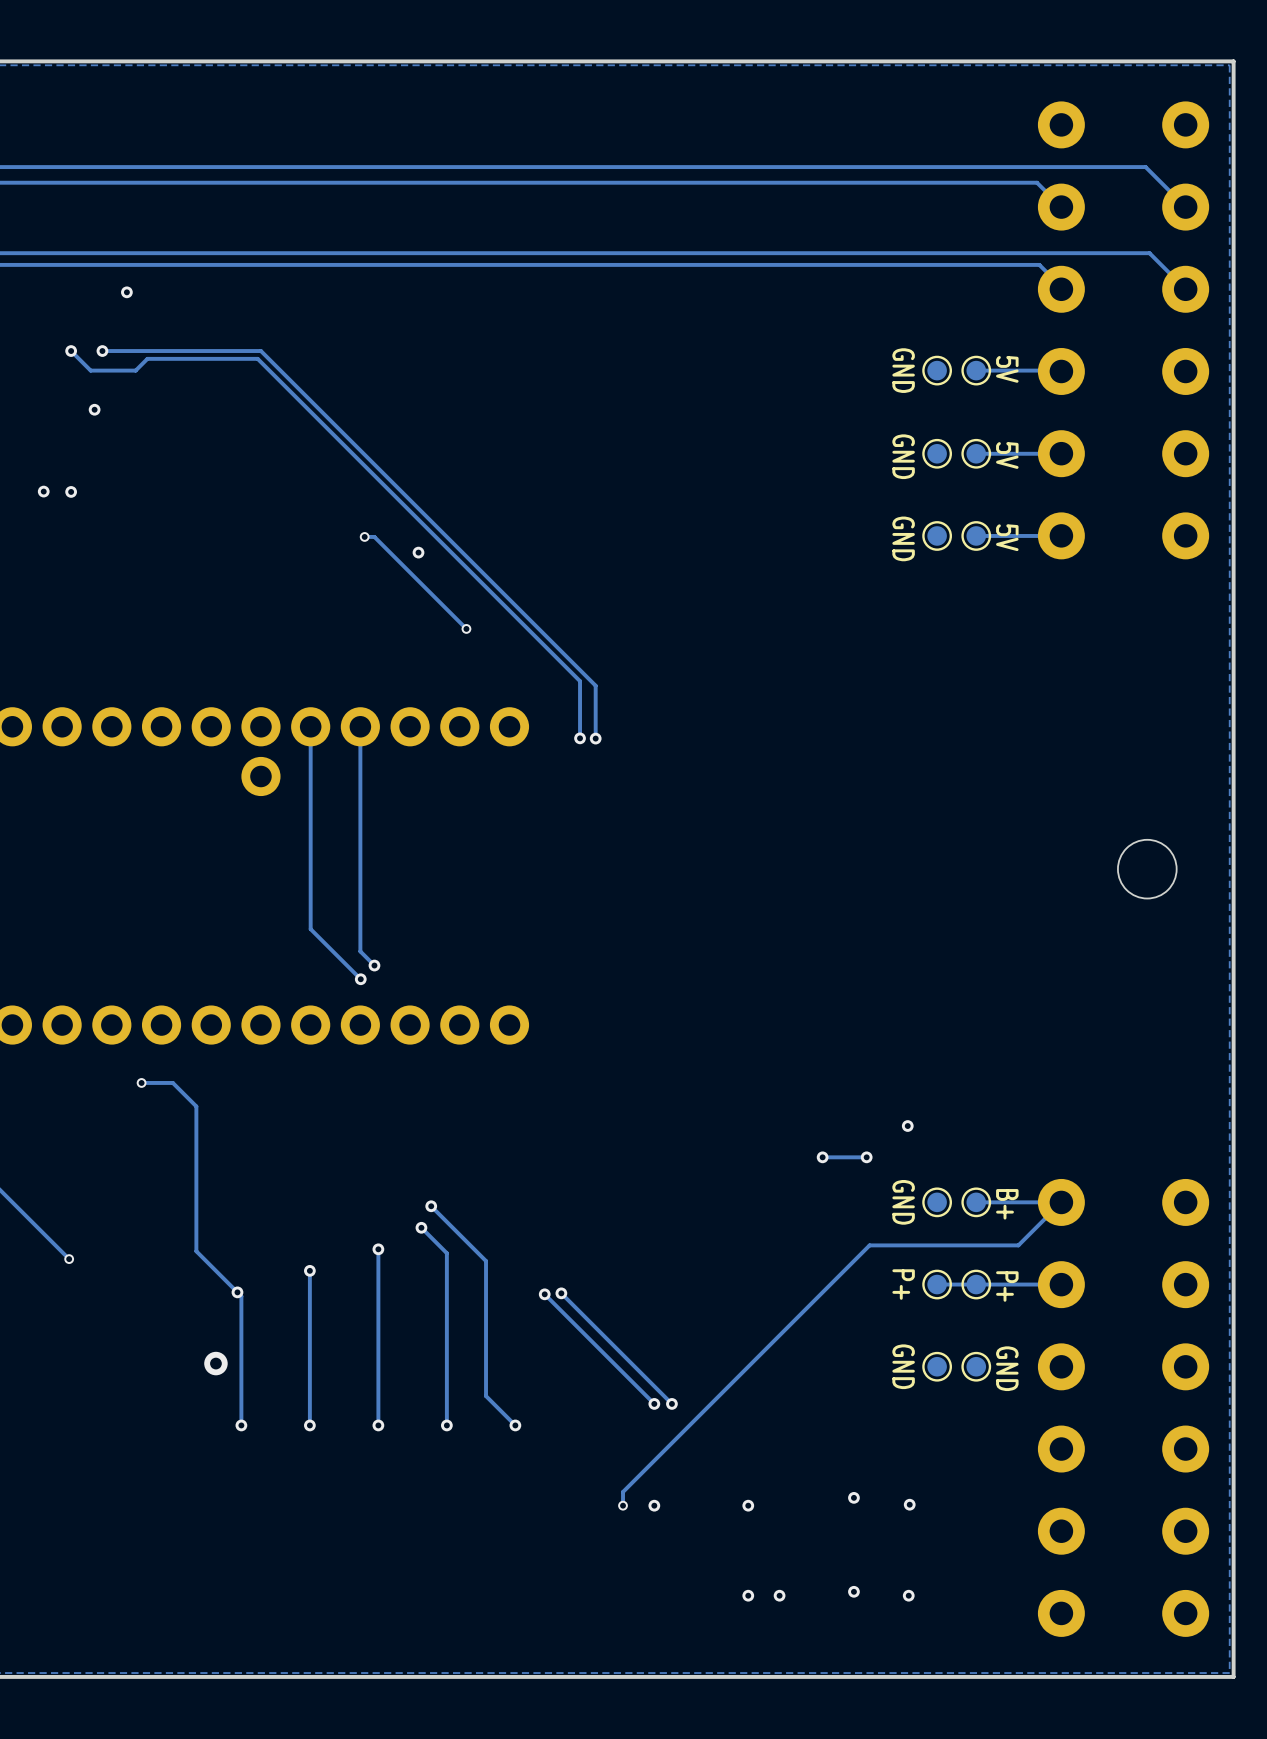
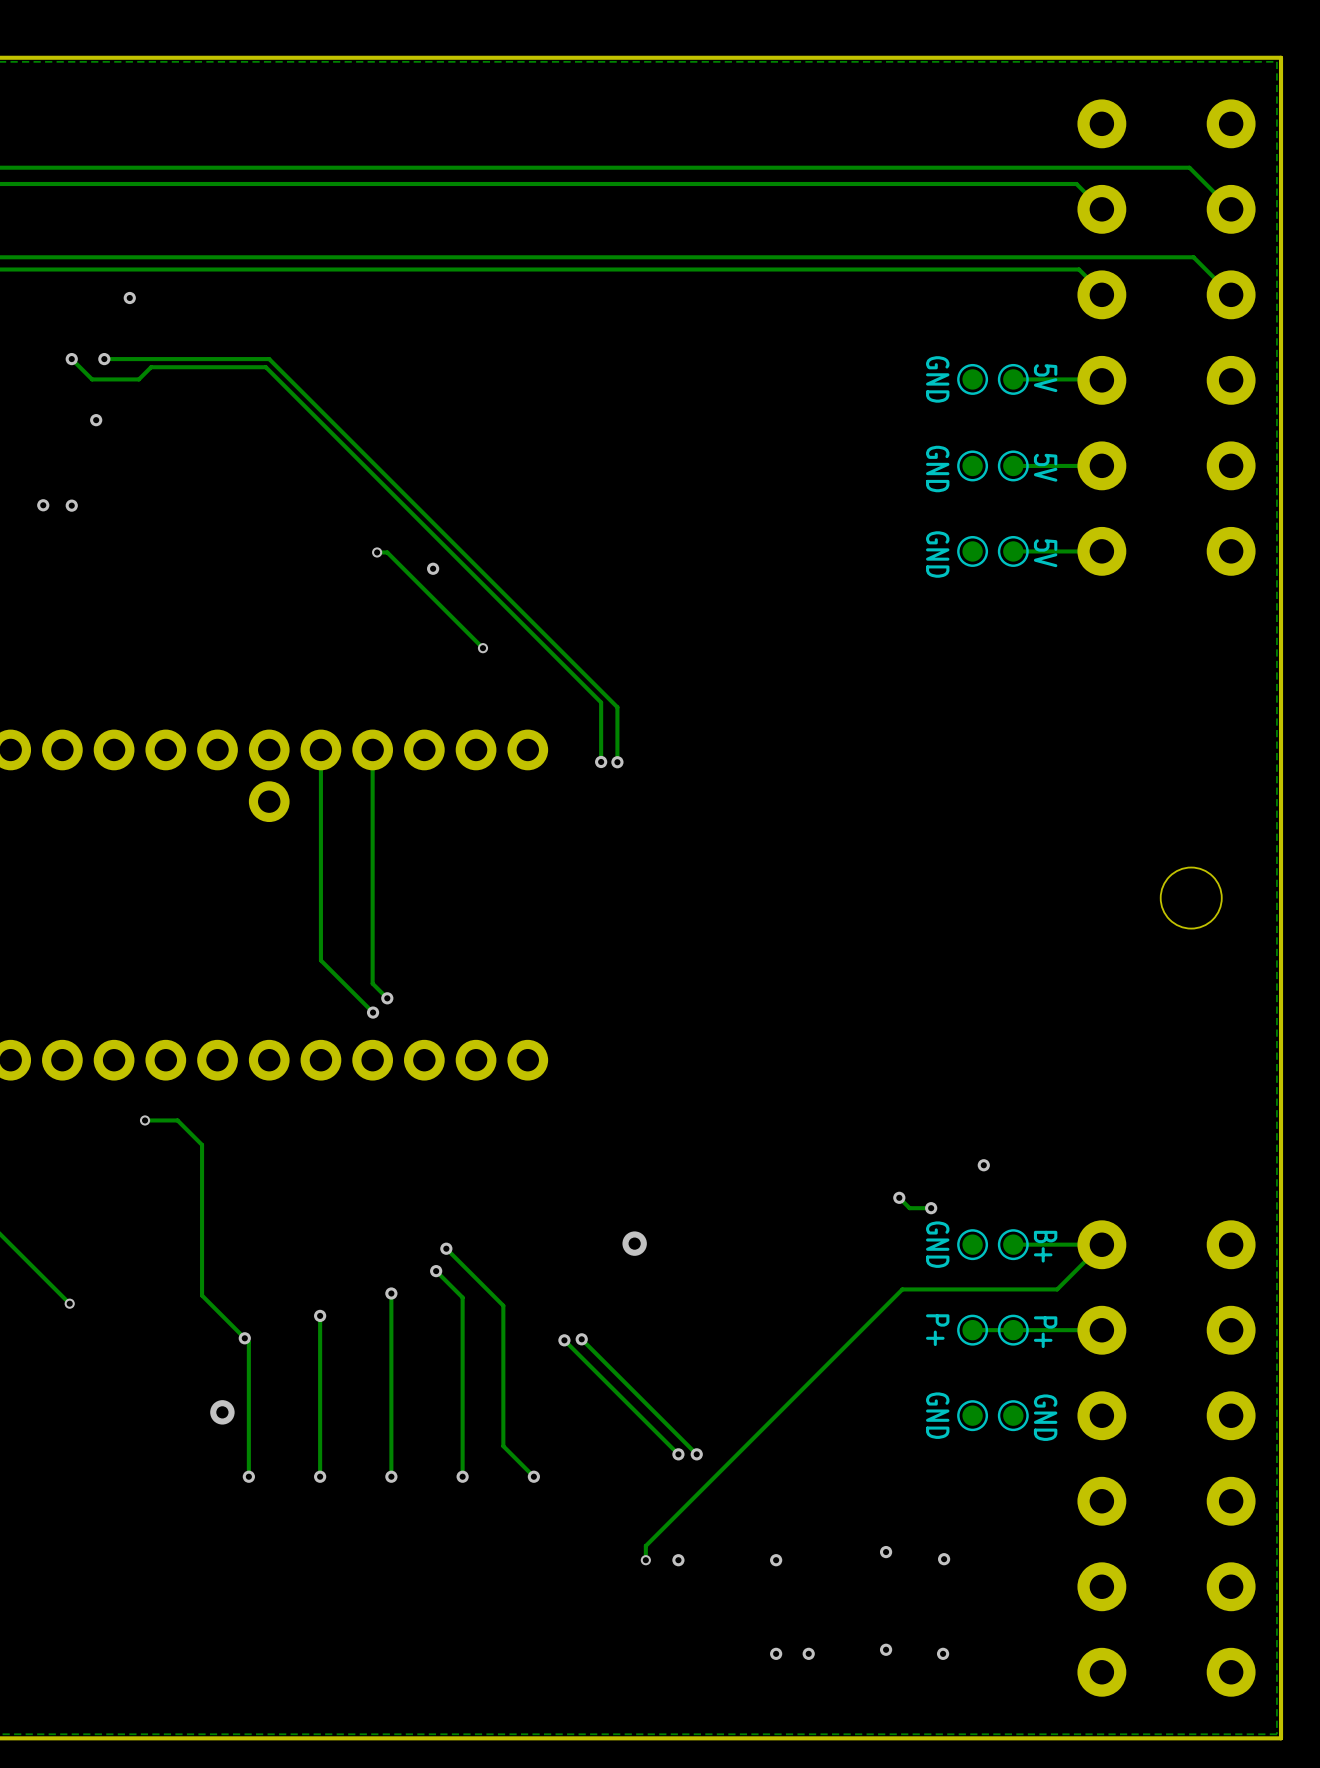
via: (907, 1126) -> none
via: none -> (983, 1165)
via: (822, 1157) -> none
track: (866, 1157) (822, 1157) -> (899, 1197) (909, 1208) (931, 1208)
via: none -> (931, 1208)
via: none -> (634, 1243)

